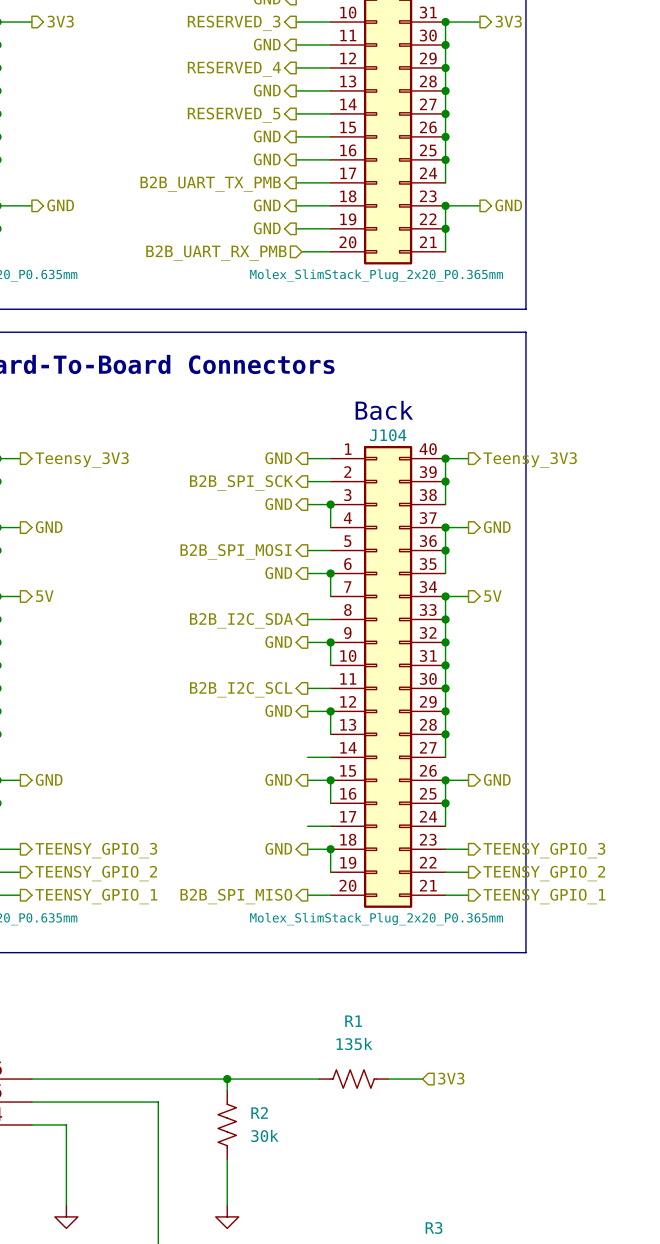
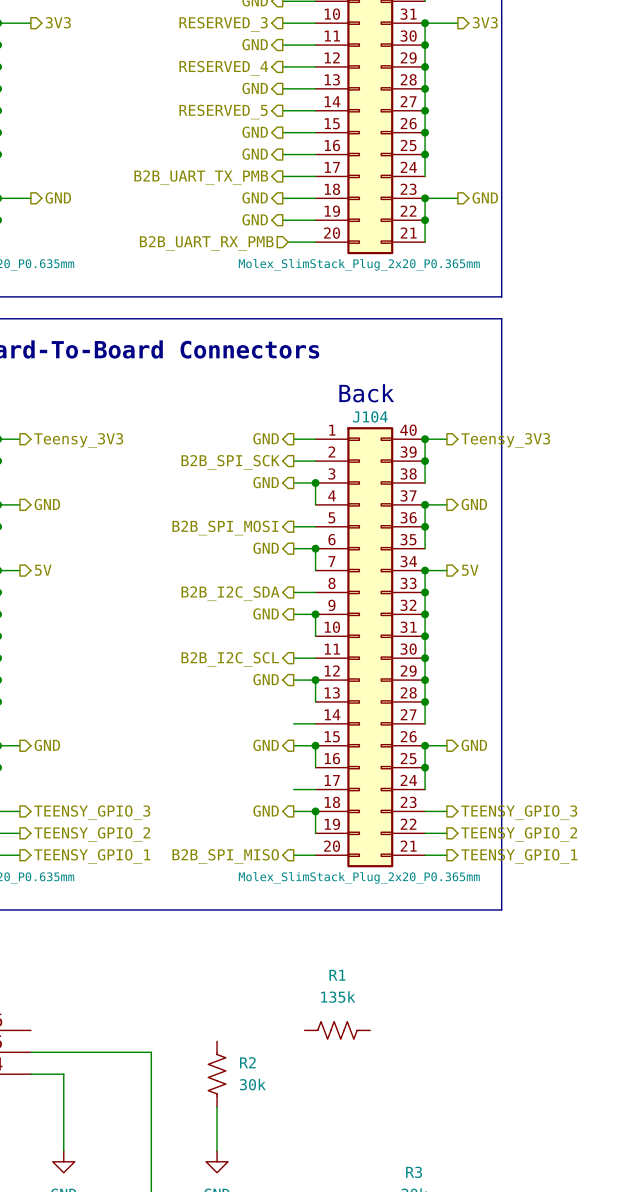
hierarchical label: 3V3 (451, 1078) -> none
wire: (31, 1079) (319, 1079) -> none
wire: (227, 1079) (227, 1090) -> none
junction: (227, 1079) -> none
wire: (388, 1079) (422, 1079) -> none

